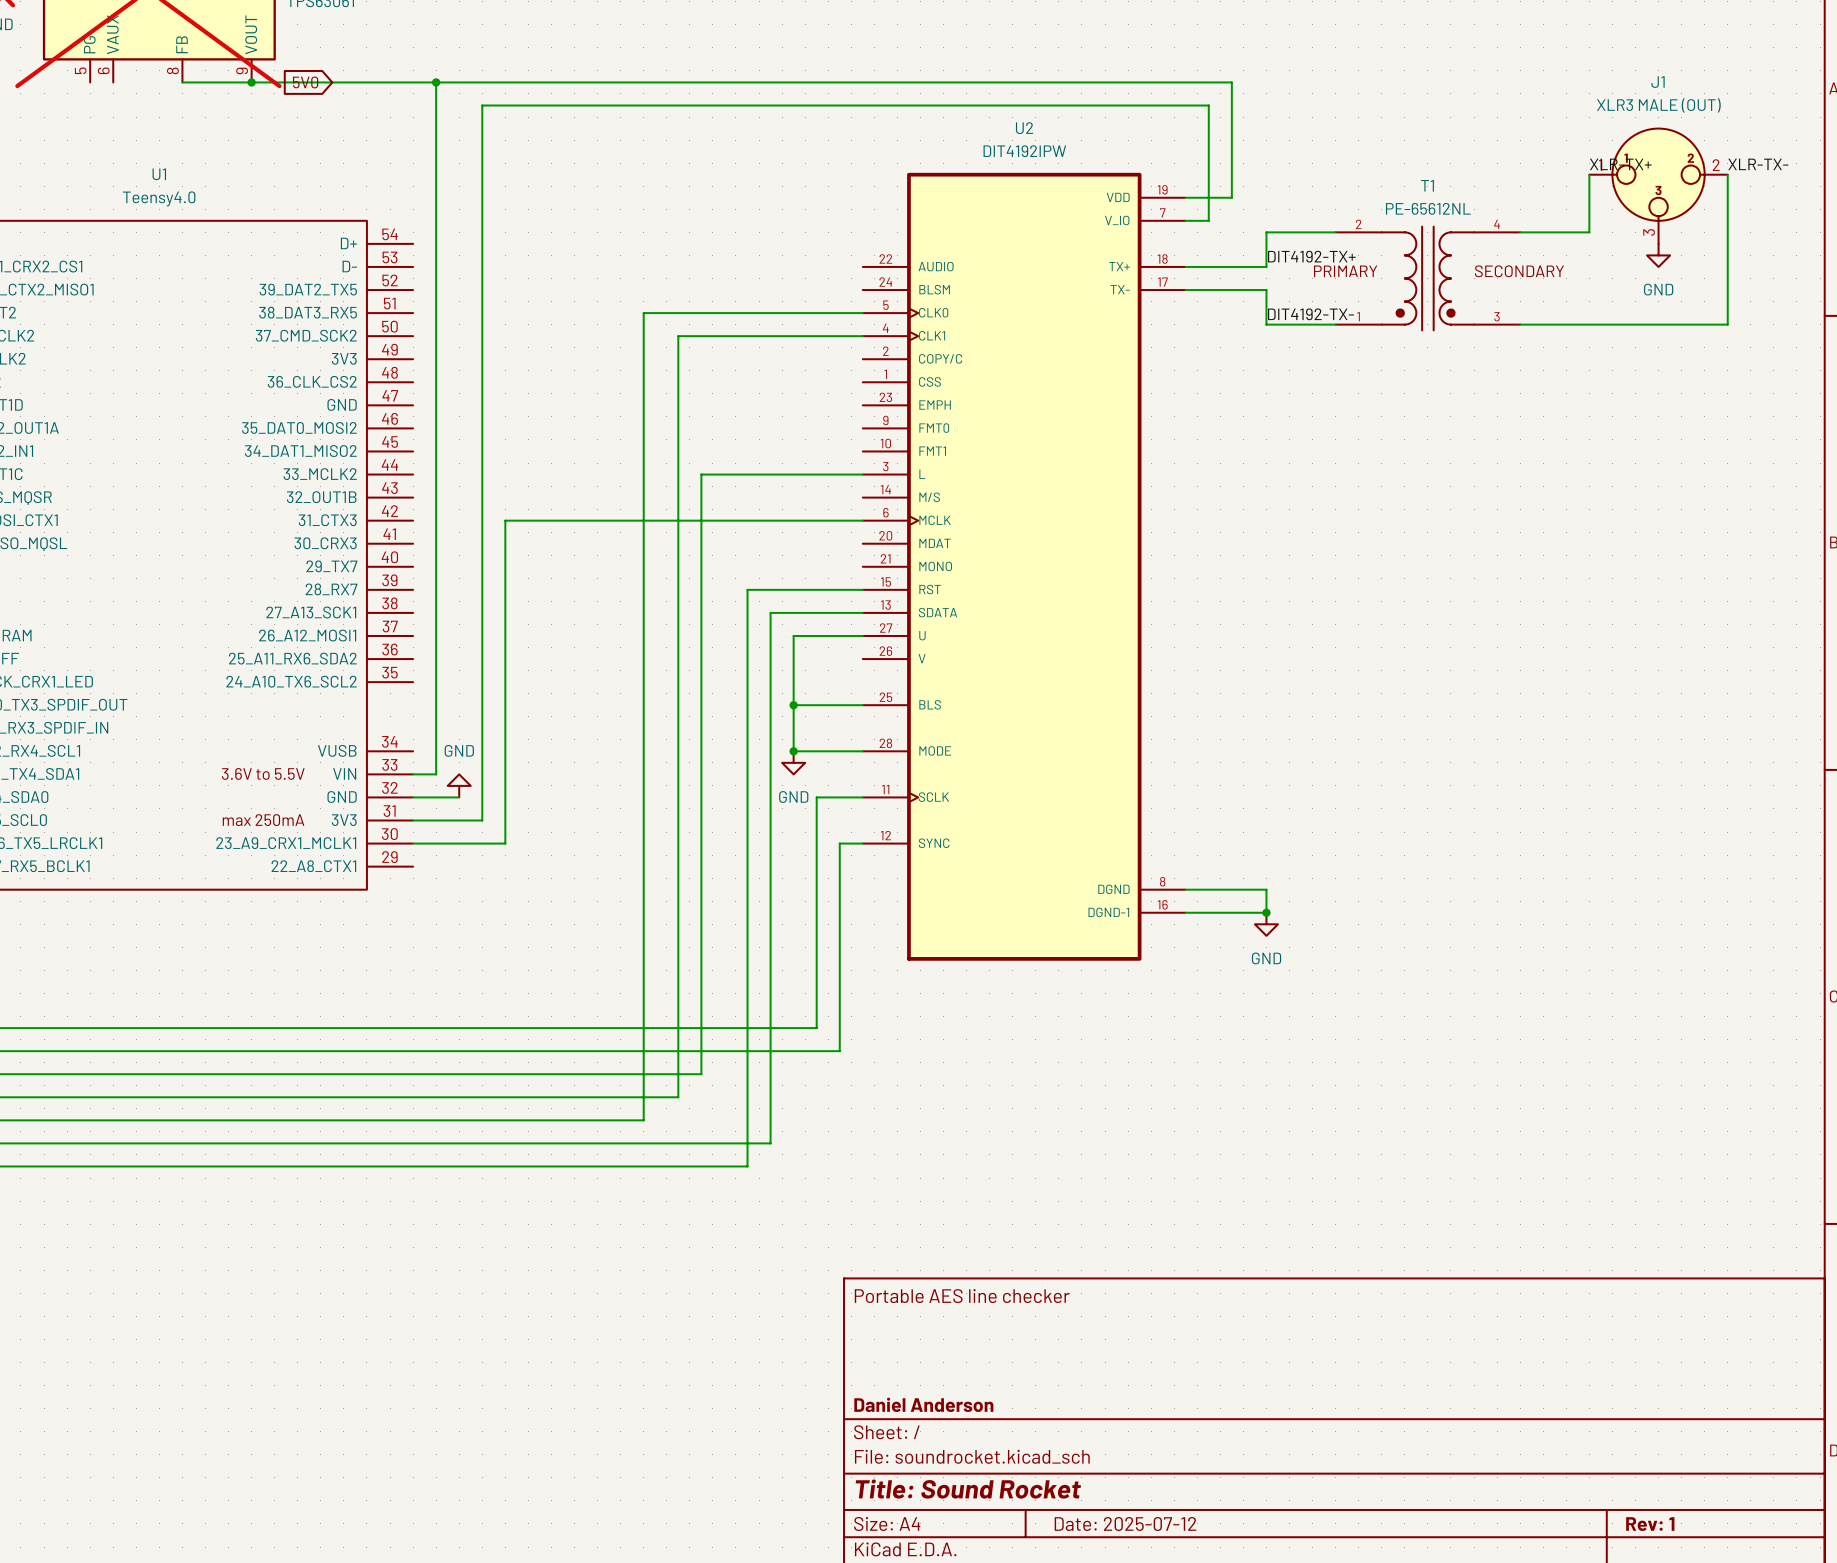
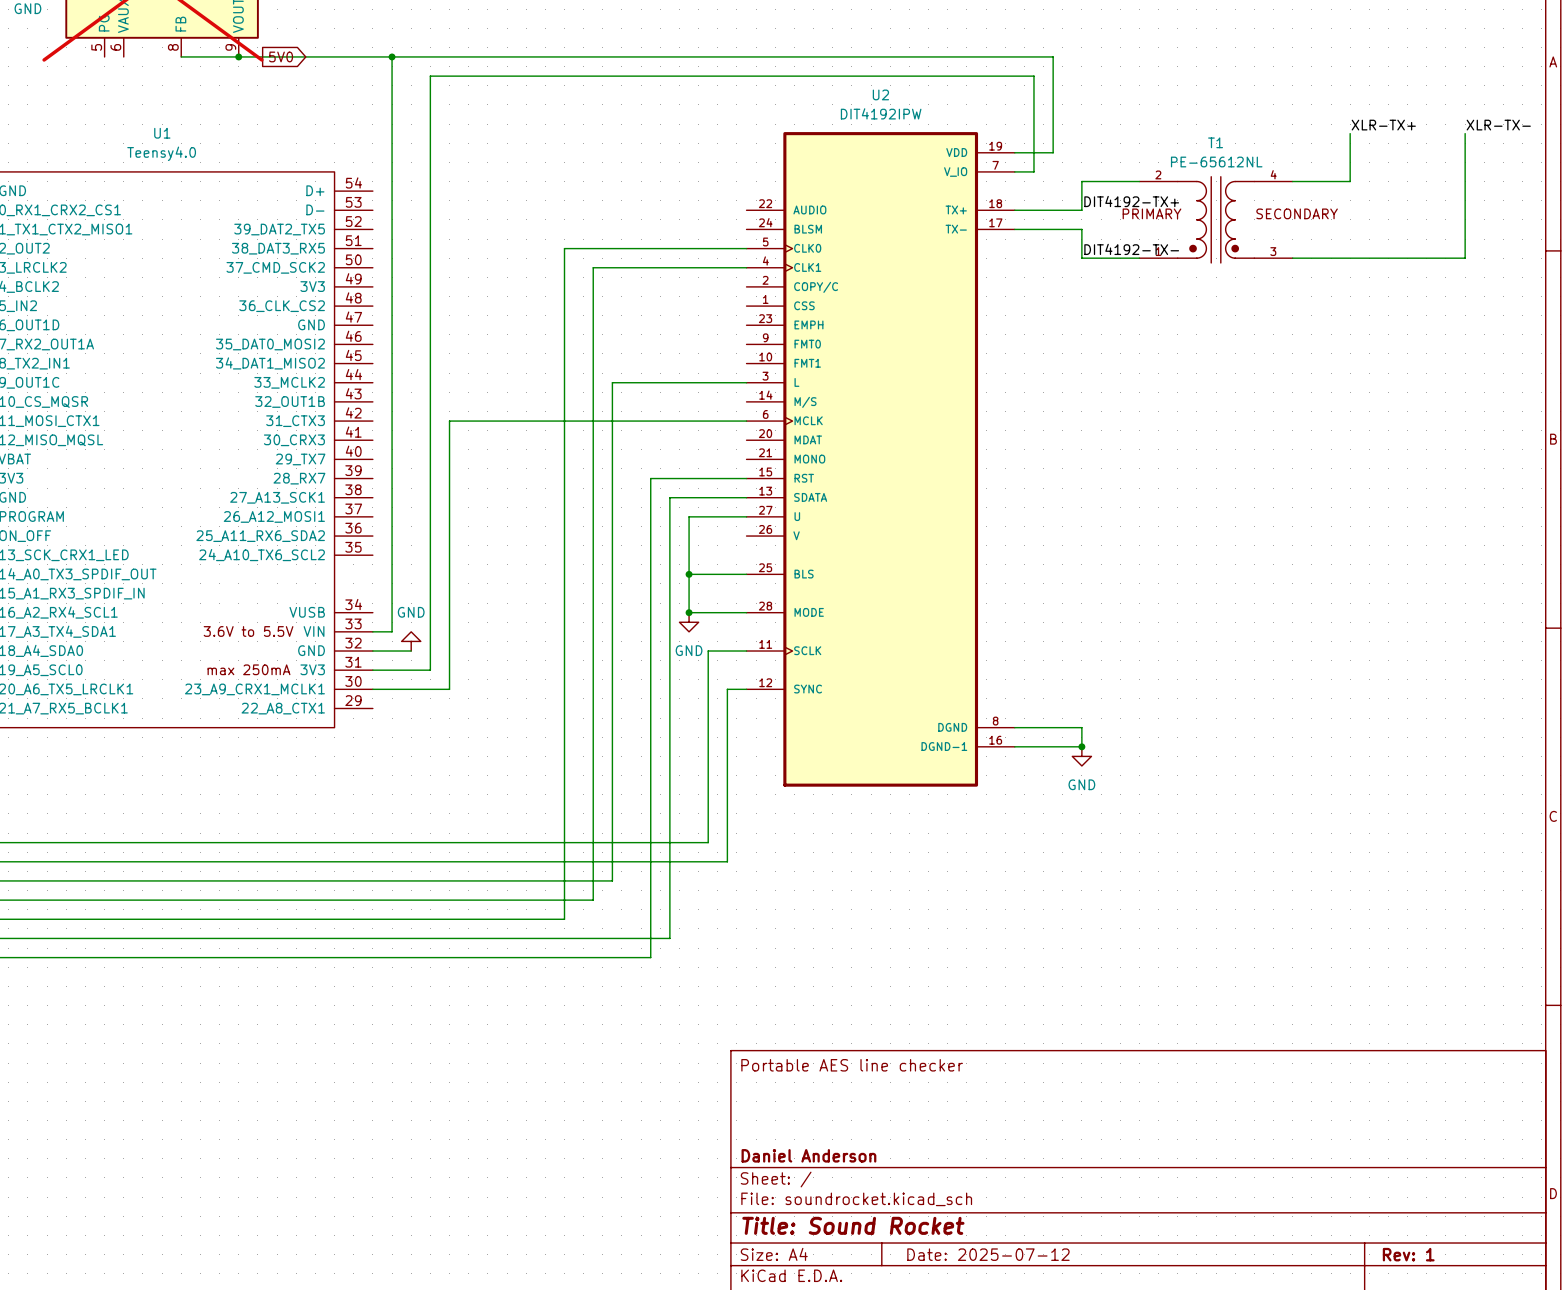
J1: XLR3 MALE (OUT) (1658, 186) -> none
power symbol: GND (1658, 255) -> none

